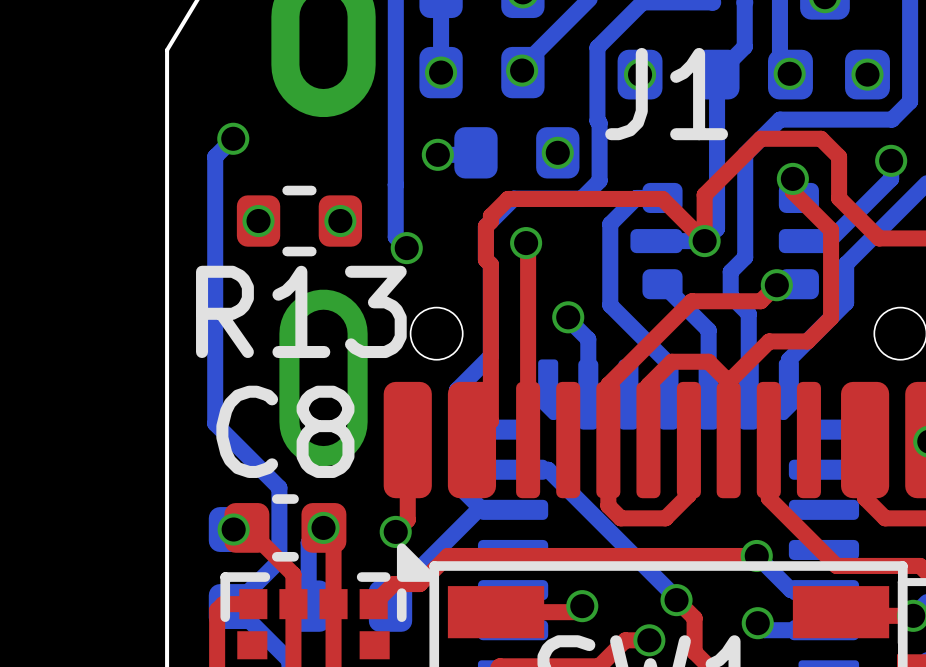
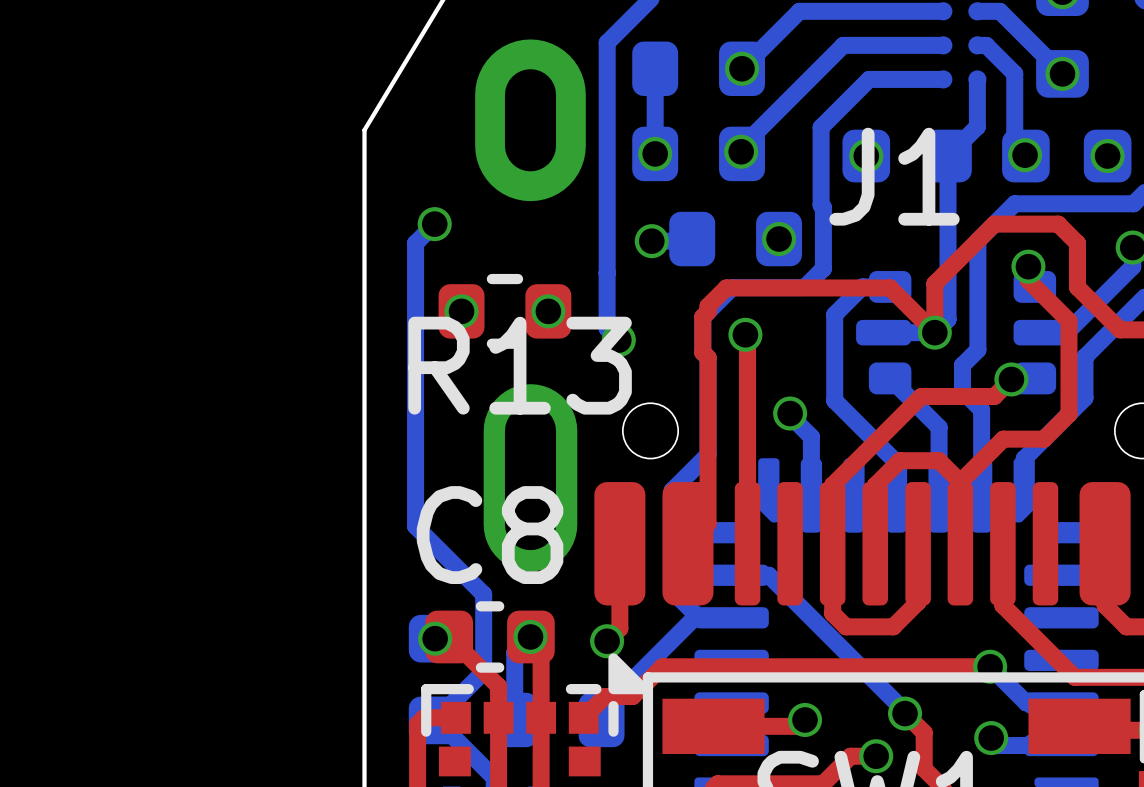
R13 name position: R13 (301, 311) -> R13 (520, 365)

